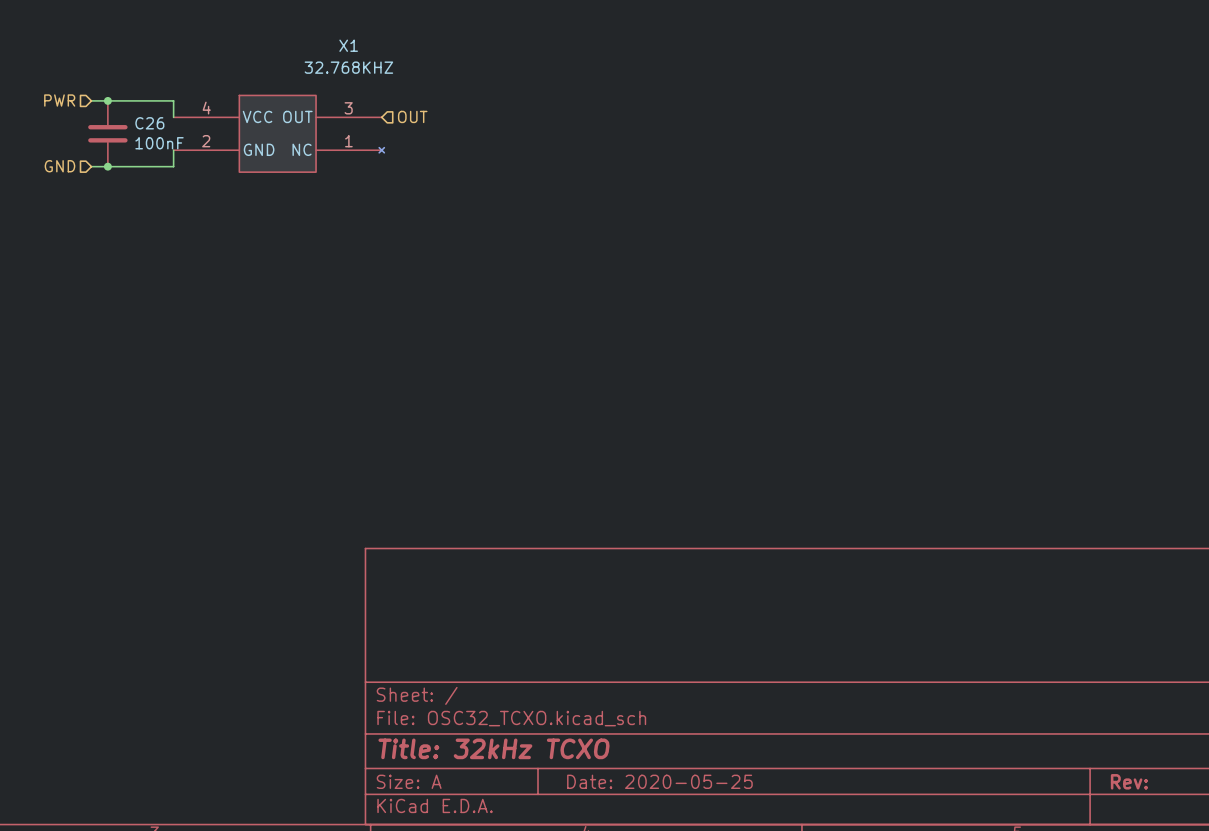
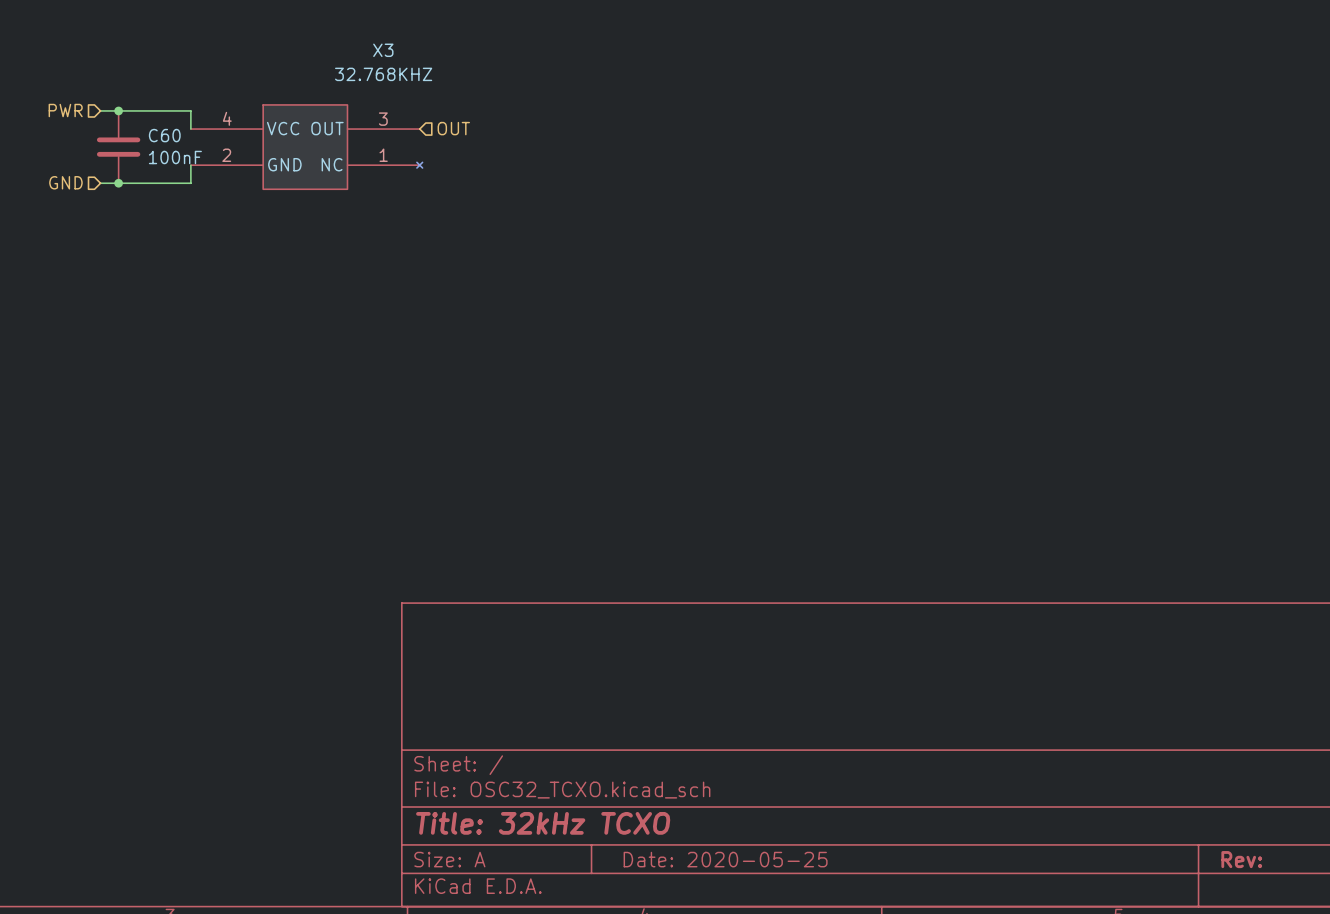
X1 name: X1 (348, 45) -> X3 (383, 50)
C26 name: C26 (149, 123) -> C60 (164, 135)

